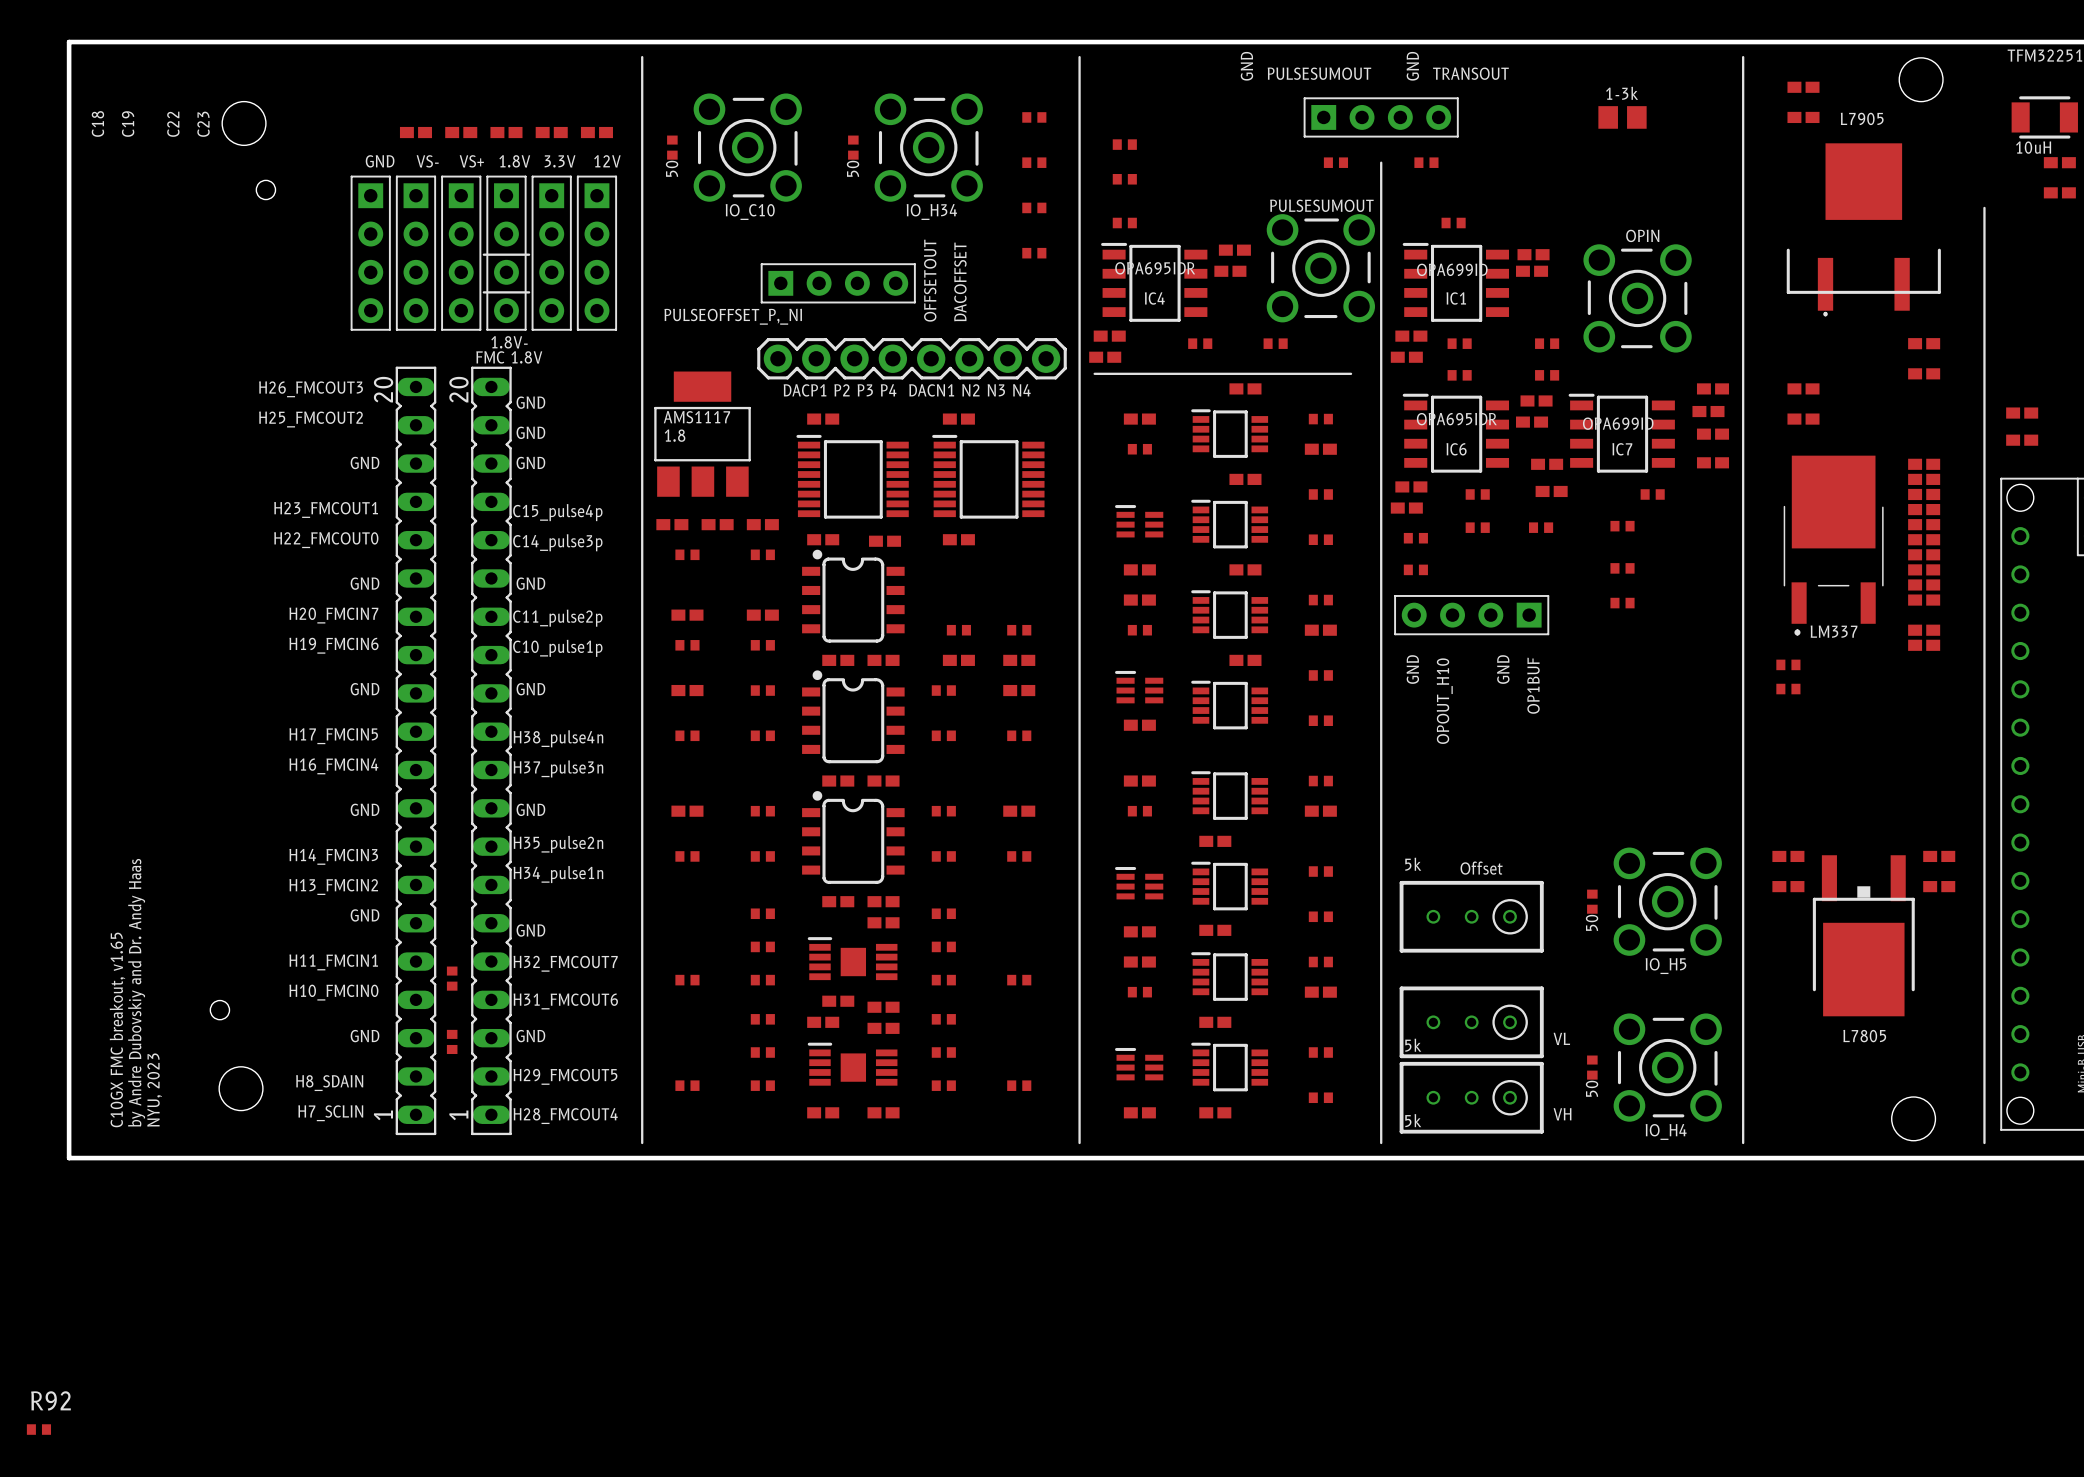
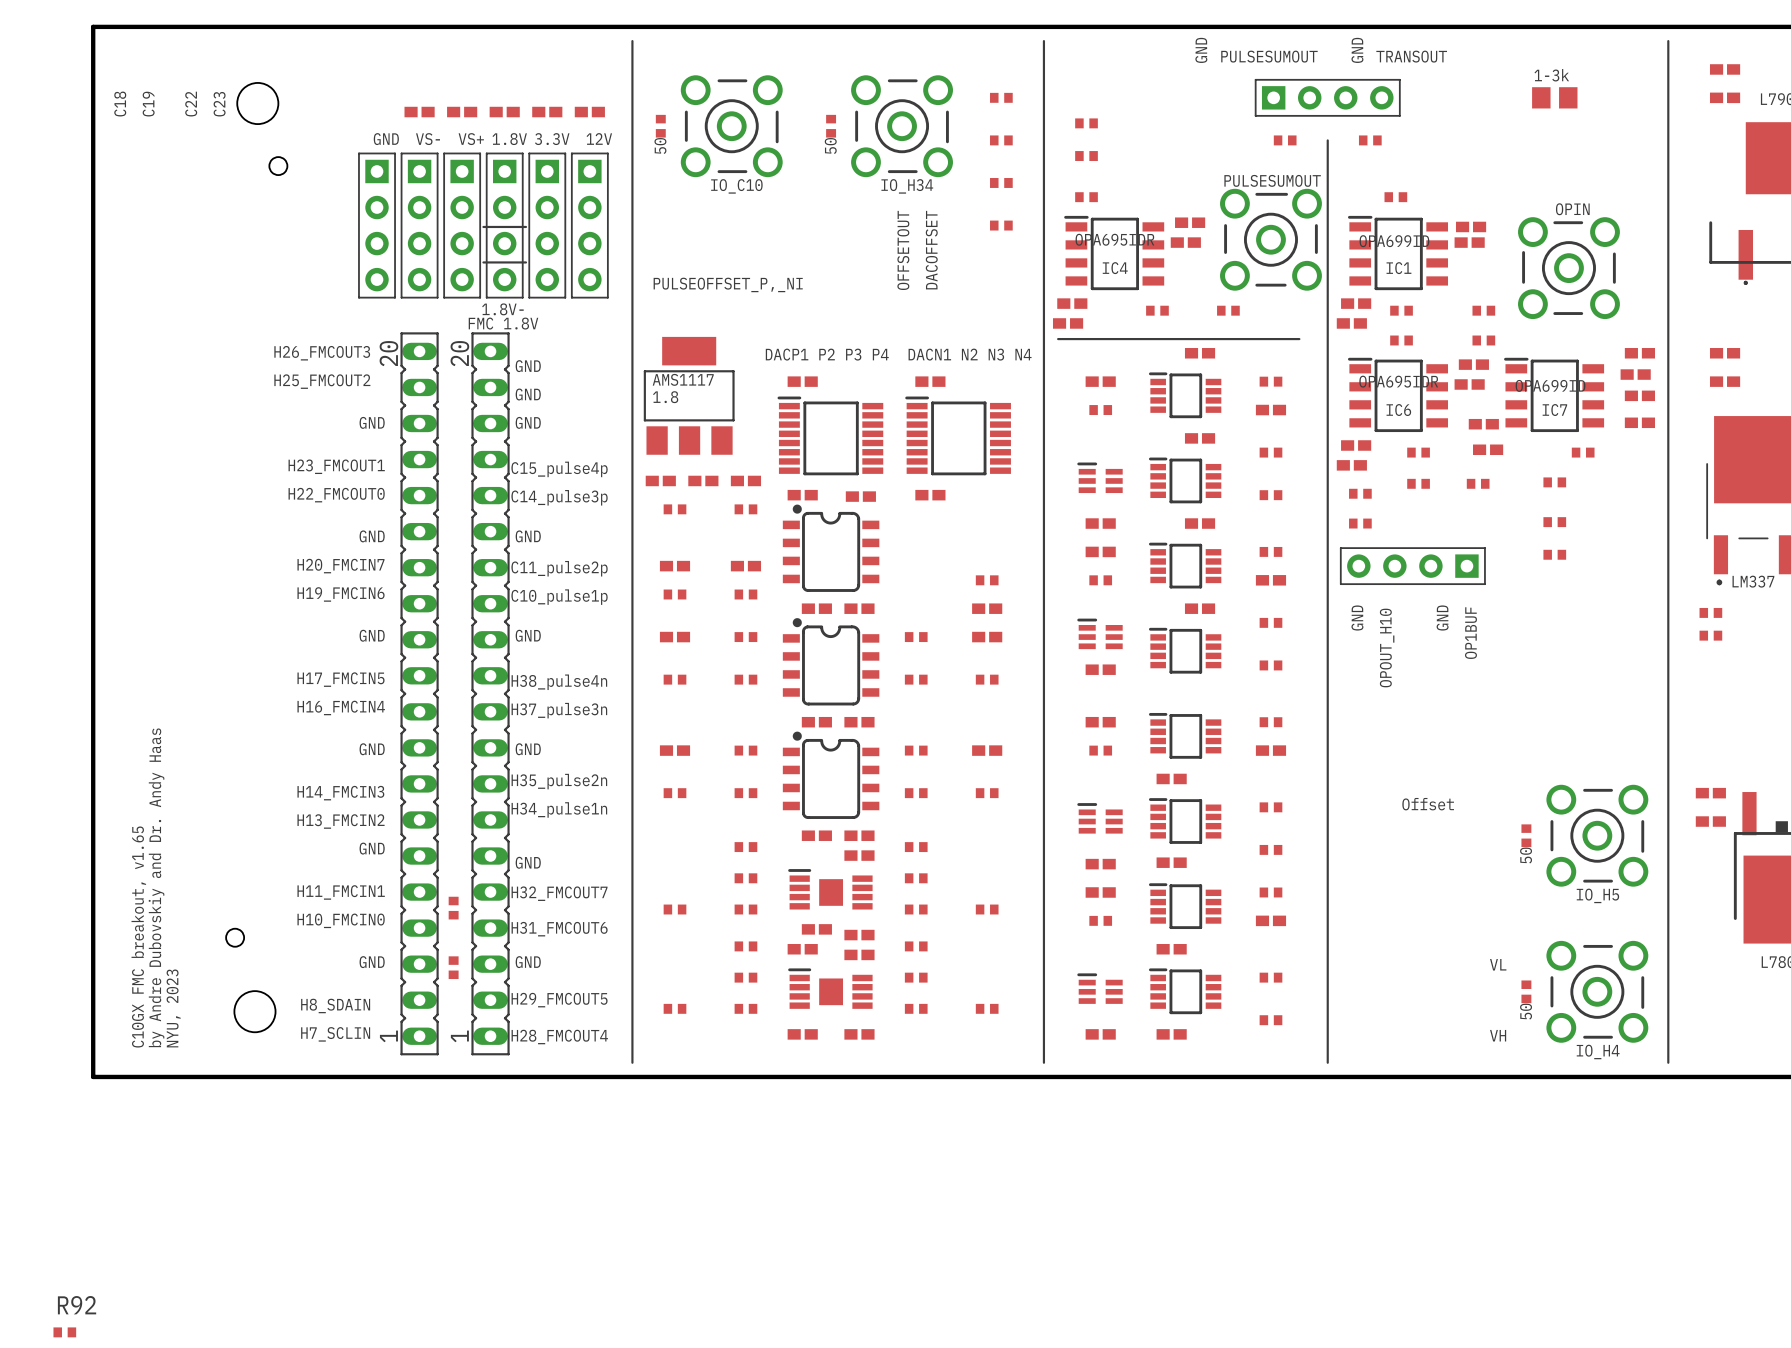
part: (838, 283) -> none
part: (912, 358) -> none
part: (958, 630) -> none
part: (958, 660) -> none
part: 5k (1471, 916) -> none
part: 5k (1471, 1022) -> none
part: 5k (1471, 1097) -> none

